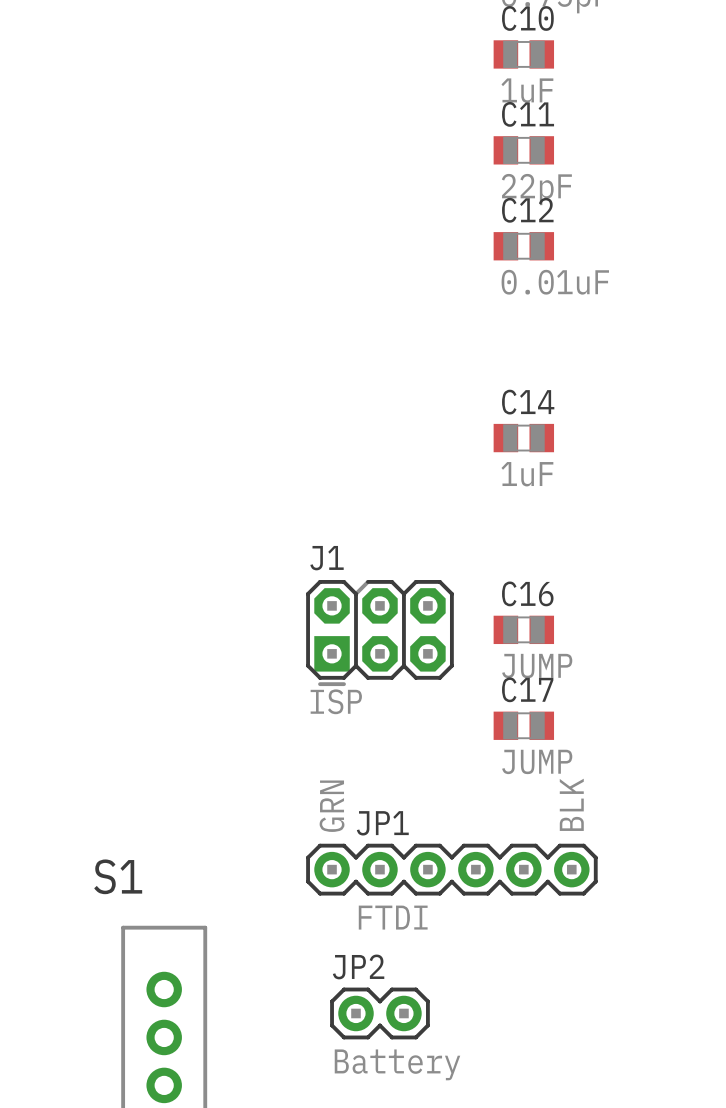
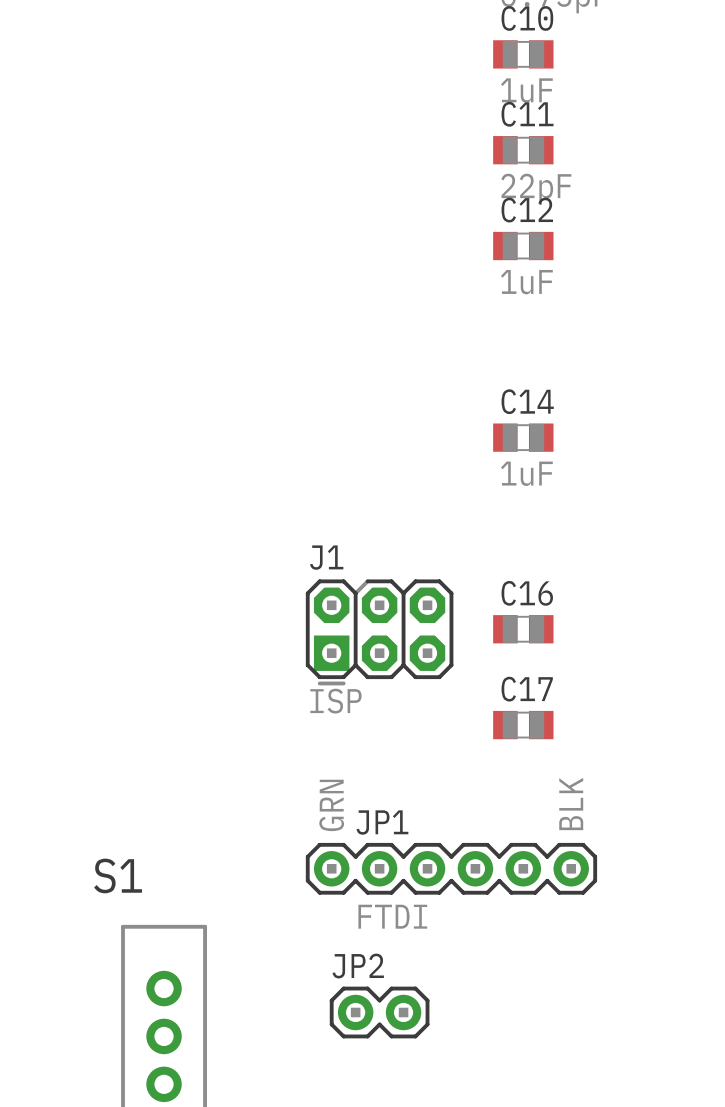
C12 value: 0.01uF (555, 282) -> 1uF (526, 282)
C16 value: JUMP (537, 666) -> none
C17 value: JUMP (537, 761) -> none
JP2 value: Battery (397, 1064) -> none

